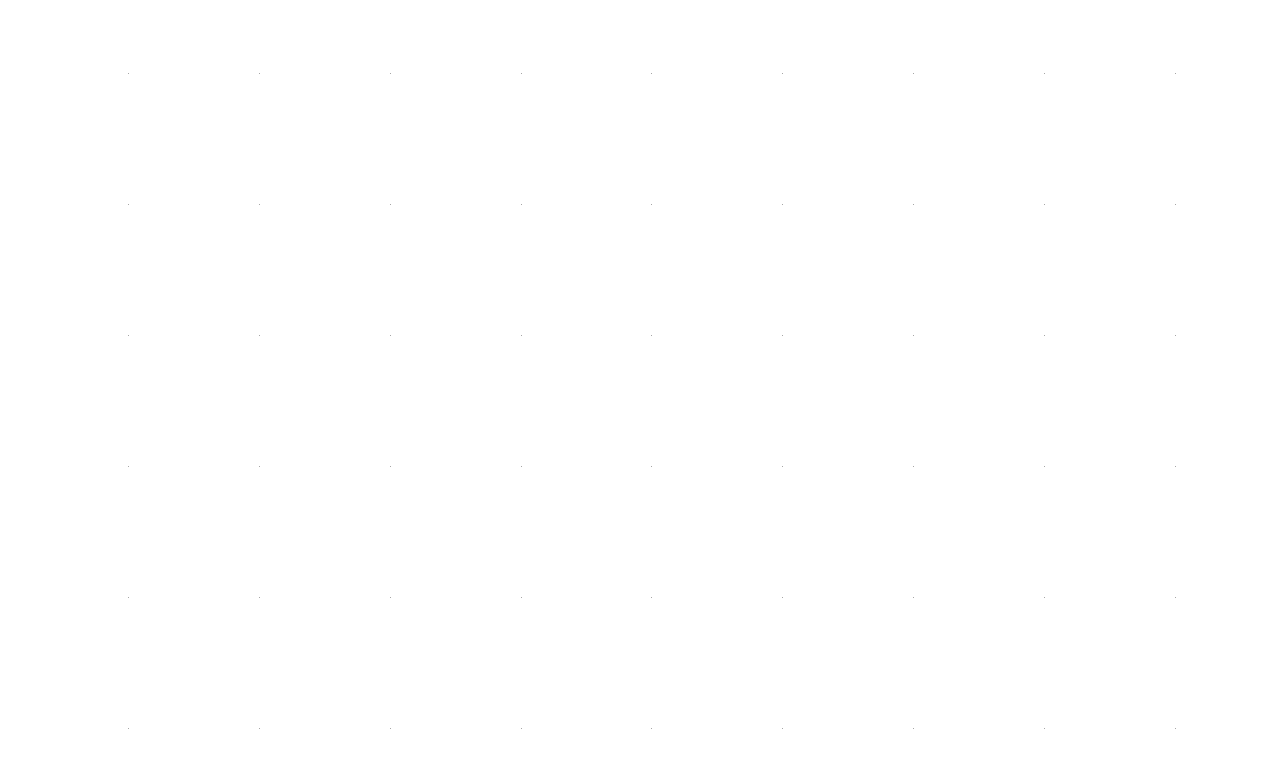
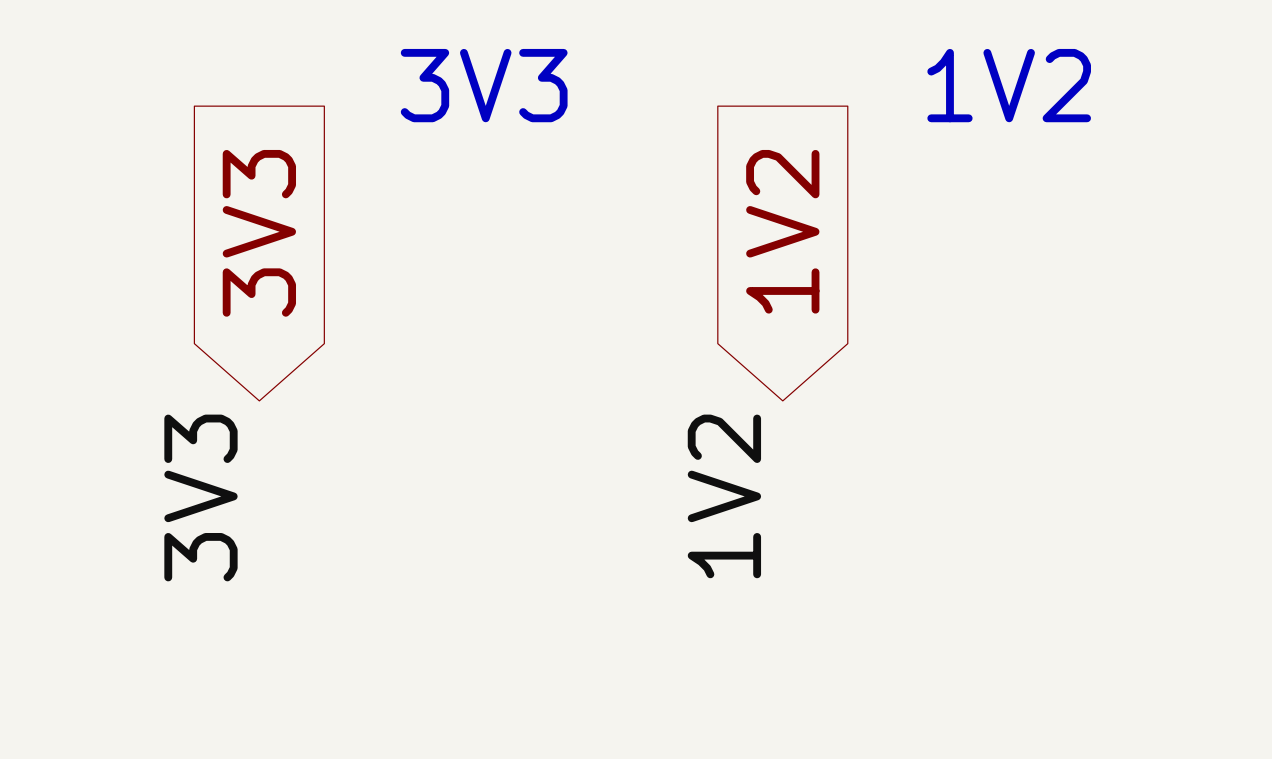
text: none -> 3V3 (484, 85)
text: none -> 1V2 (1009, 85)
global label: none -> 1V2 (782, 231)
global label: none -> 3V3 (259, 233)
label: none -> 1V2 (724, 496)
label: none -> 3V3 (200, 497)

